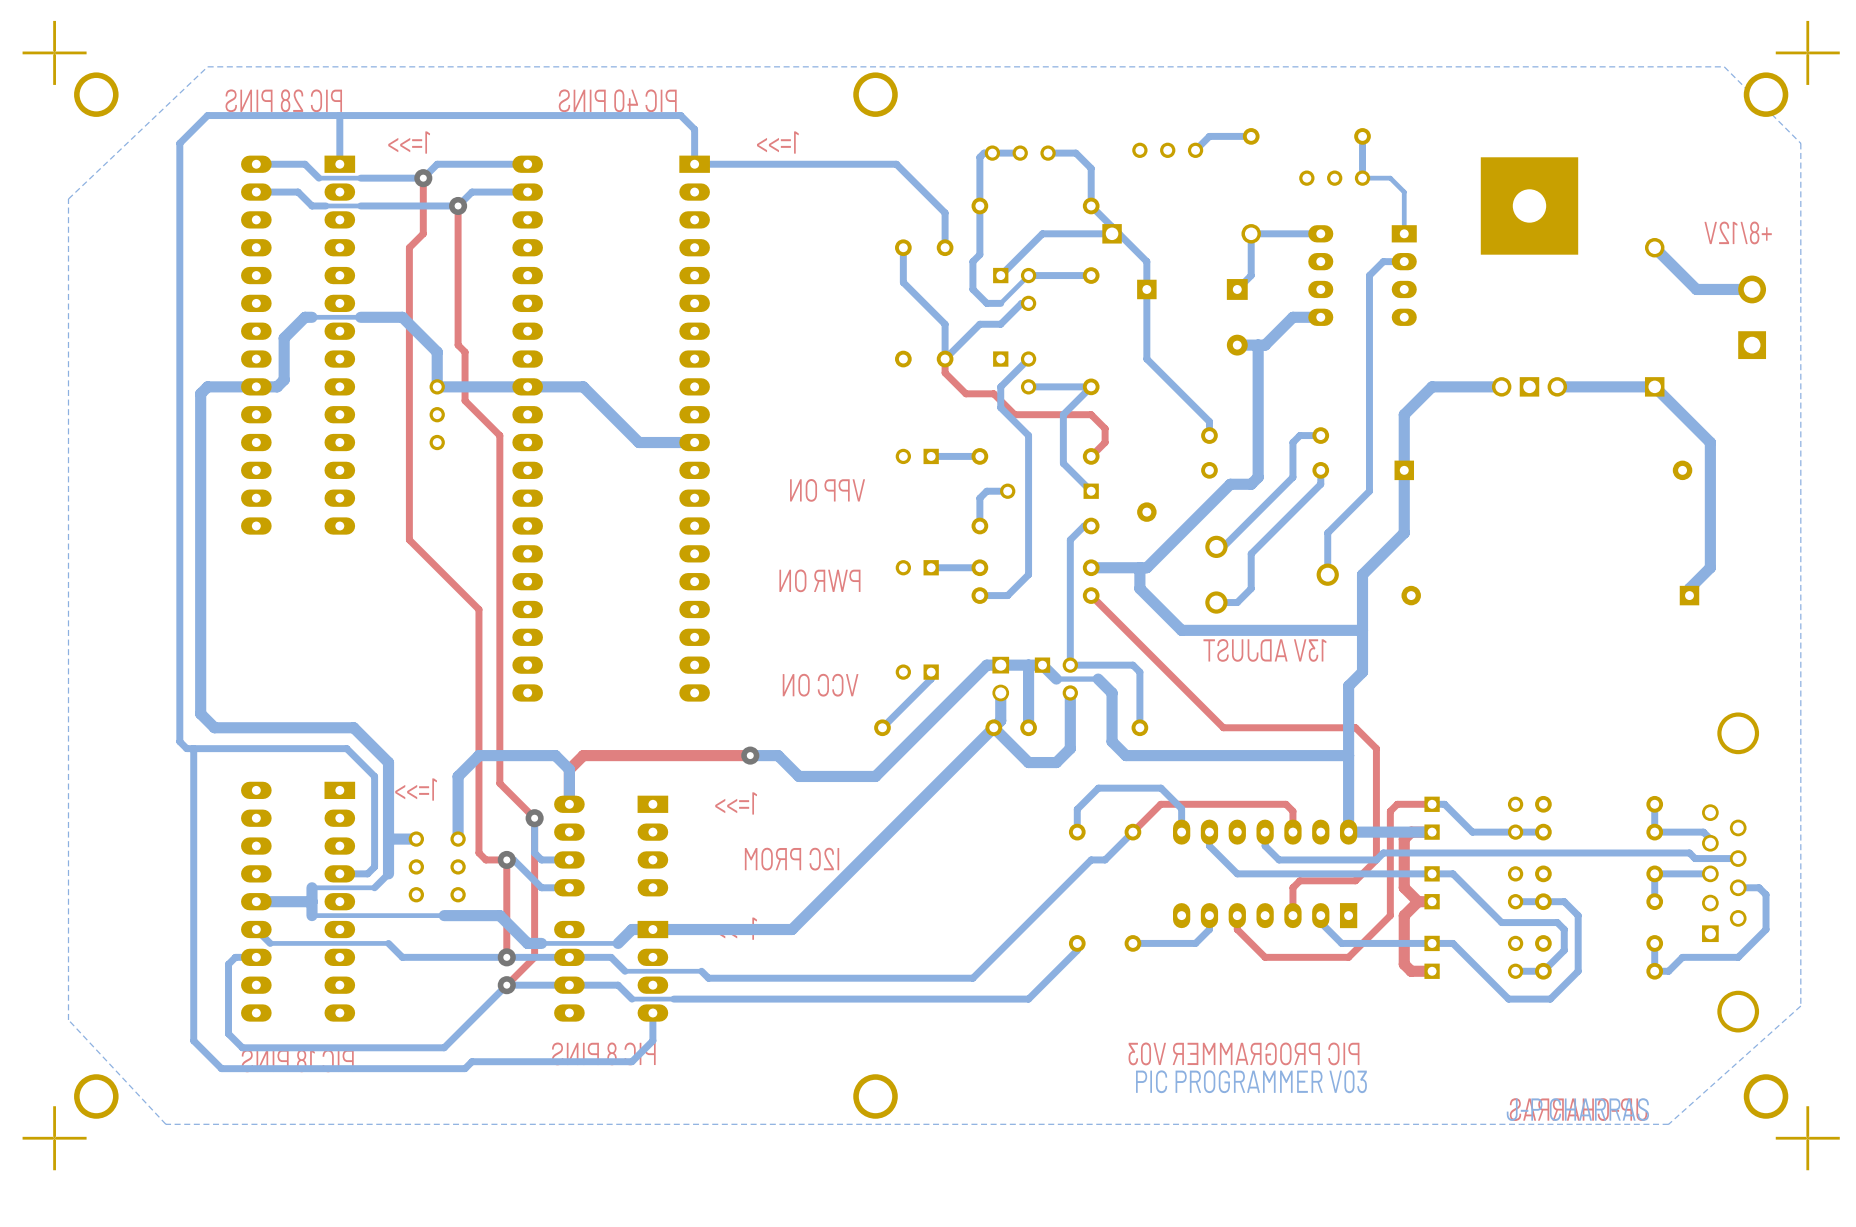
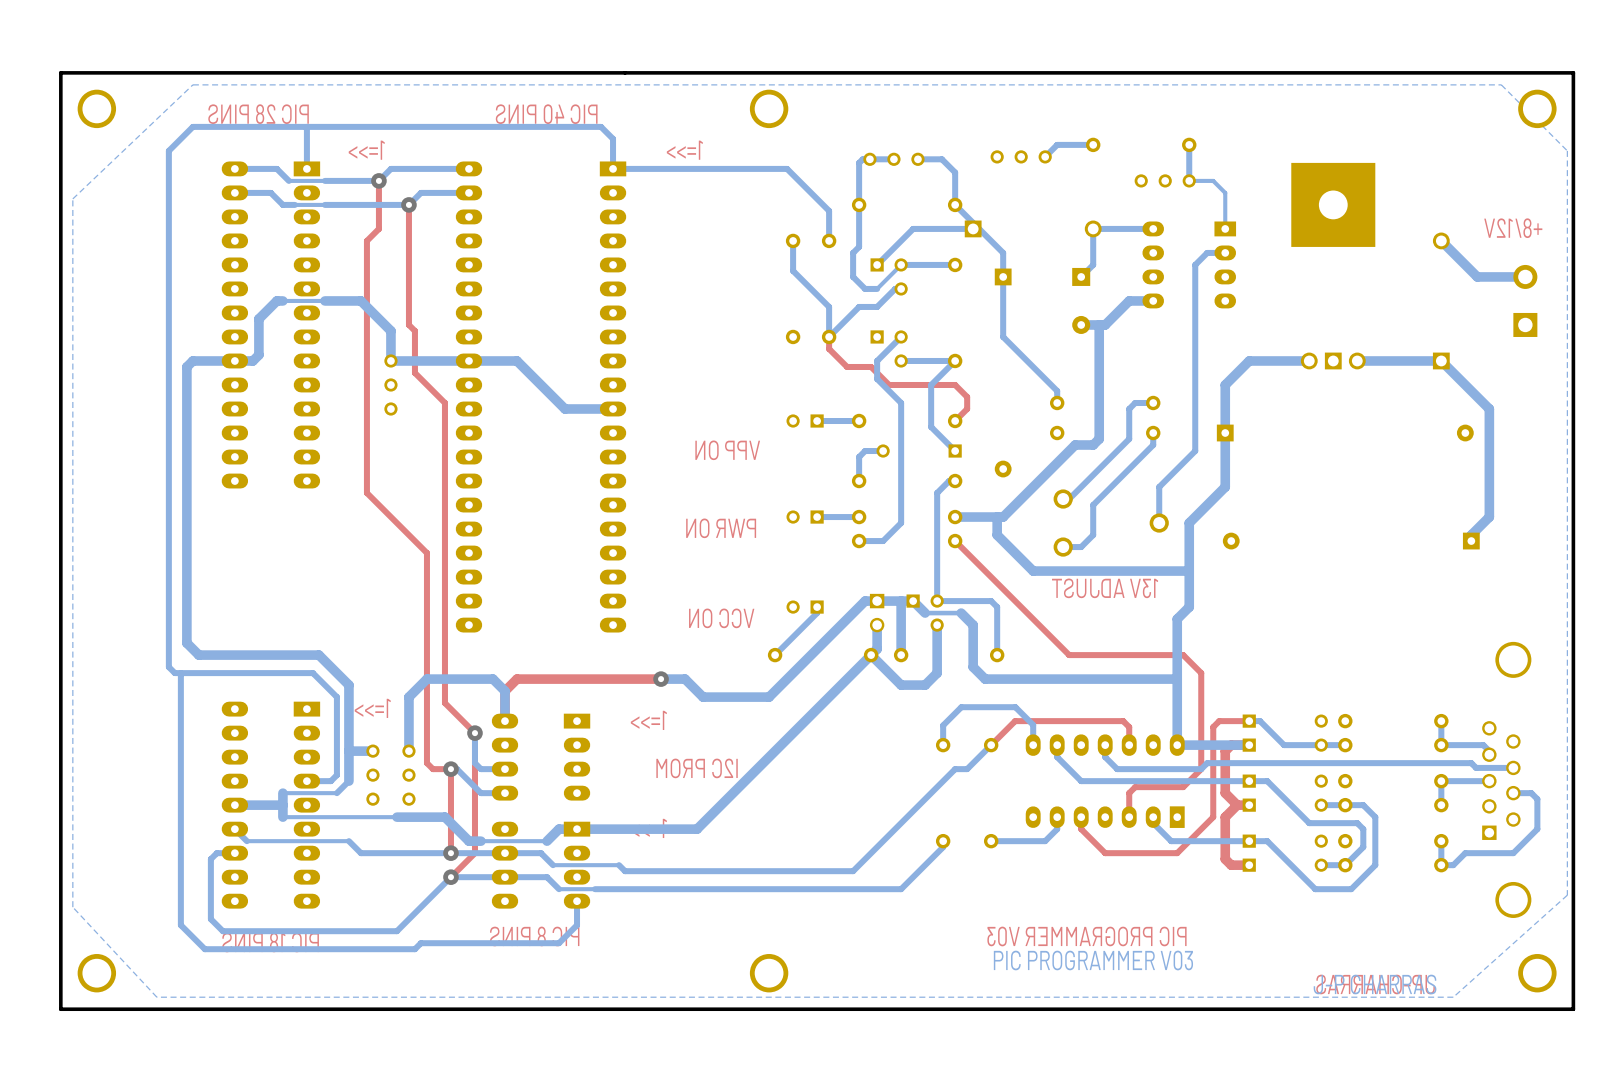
part: (54, 52) -> none
board edge: none -> (1573, 72) (1573, 1009) (60, 1009) (60, 72) (1573, 72)
part: (1807, 52) -> none
part: (54, 1138) -> none
part: (1807, 1138) -> none

